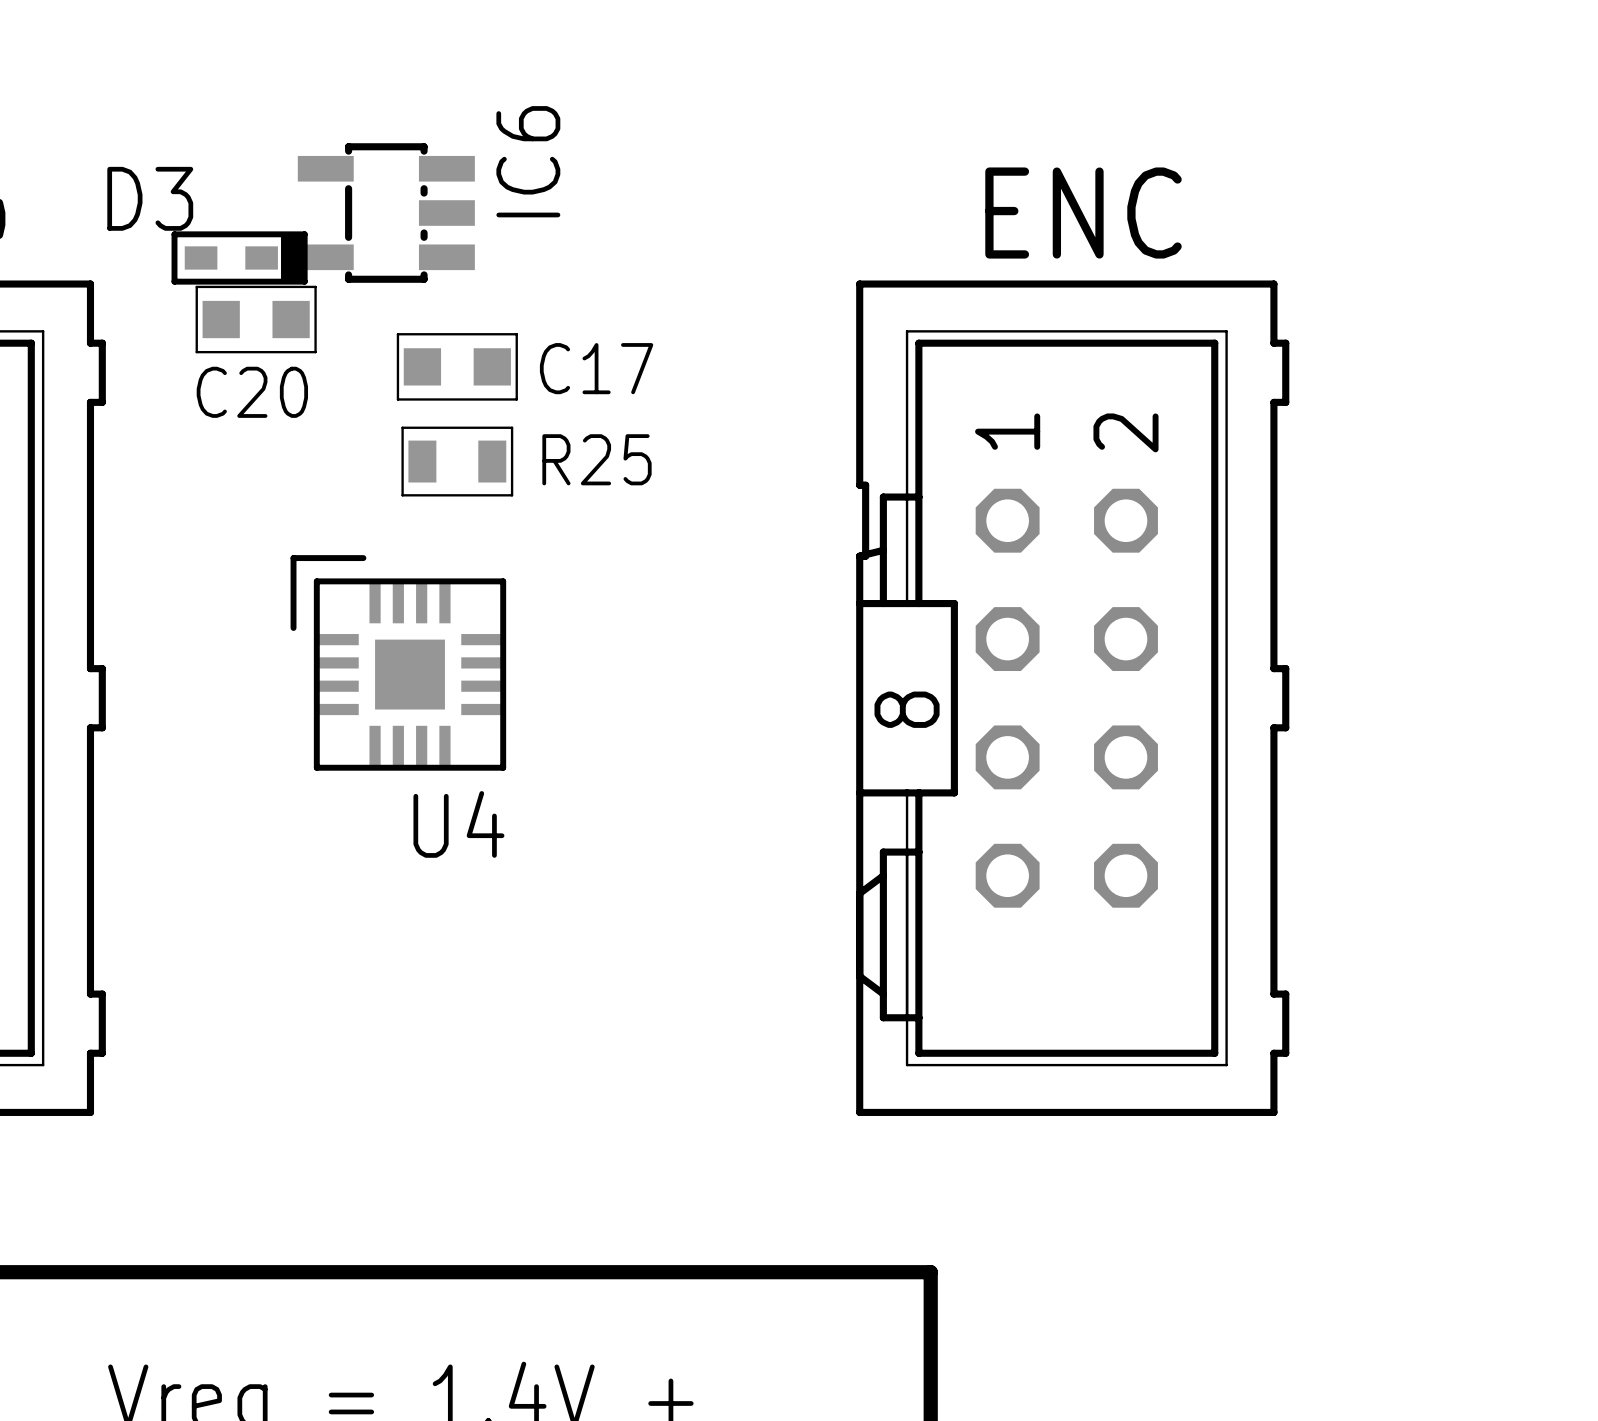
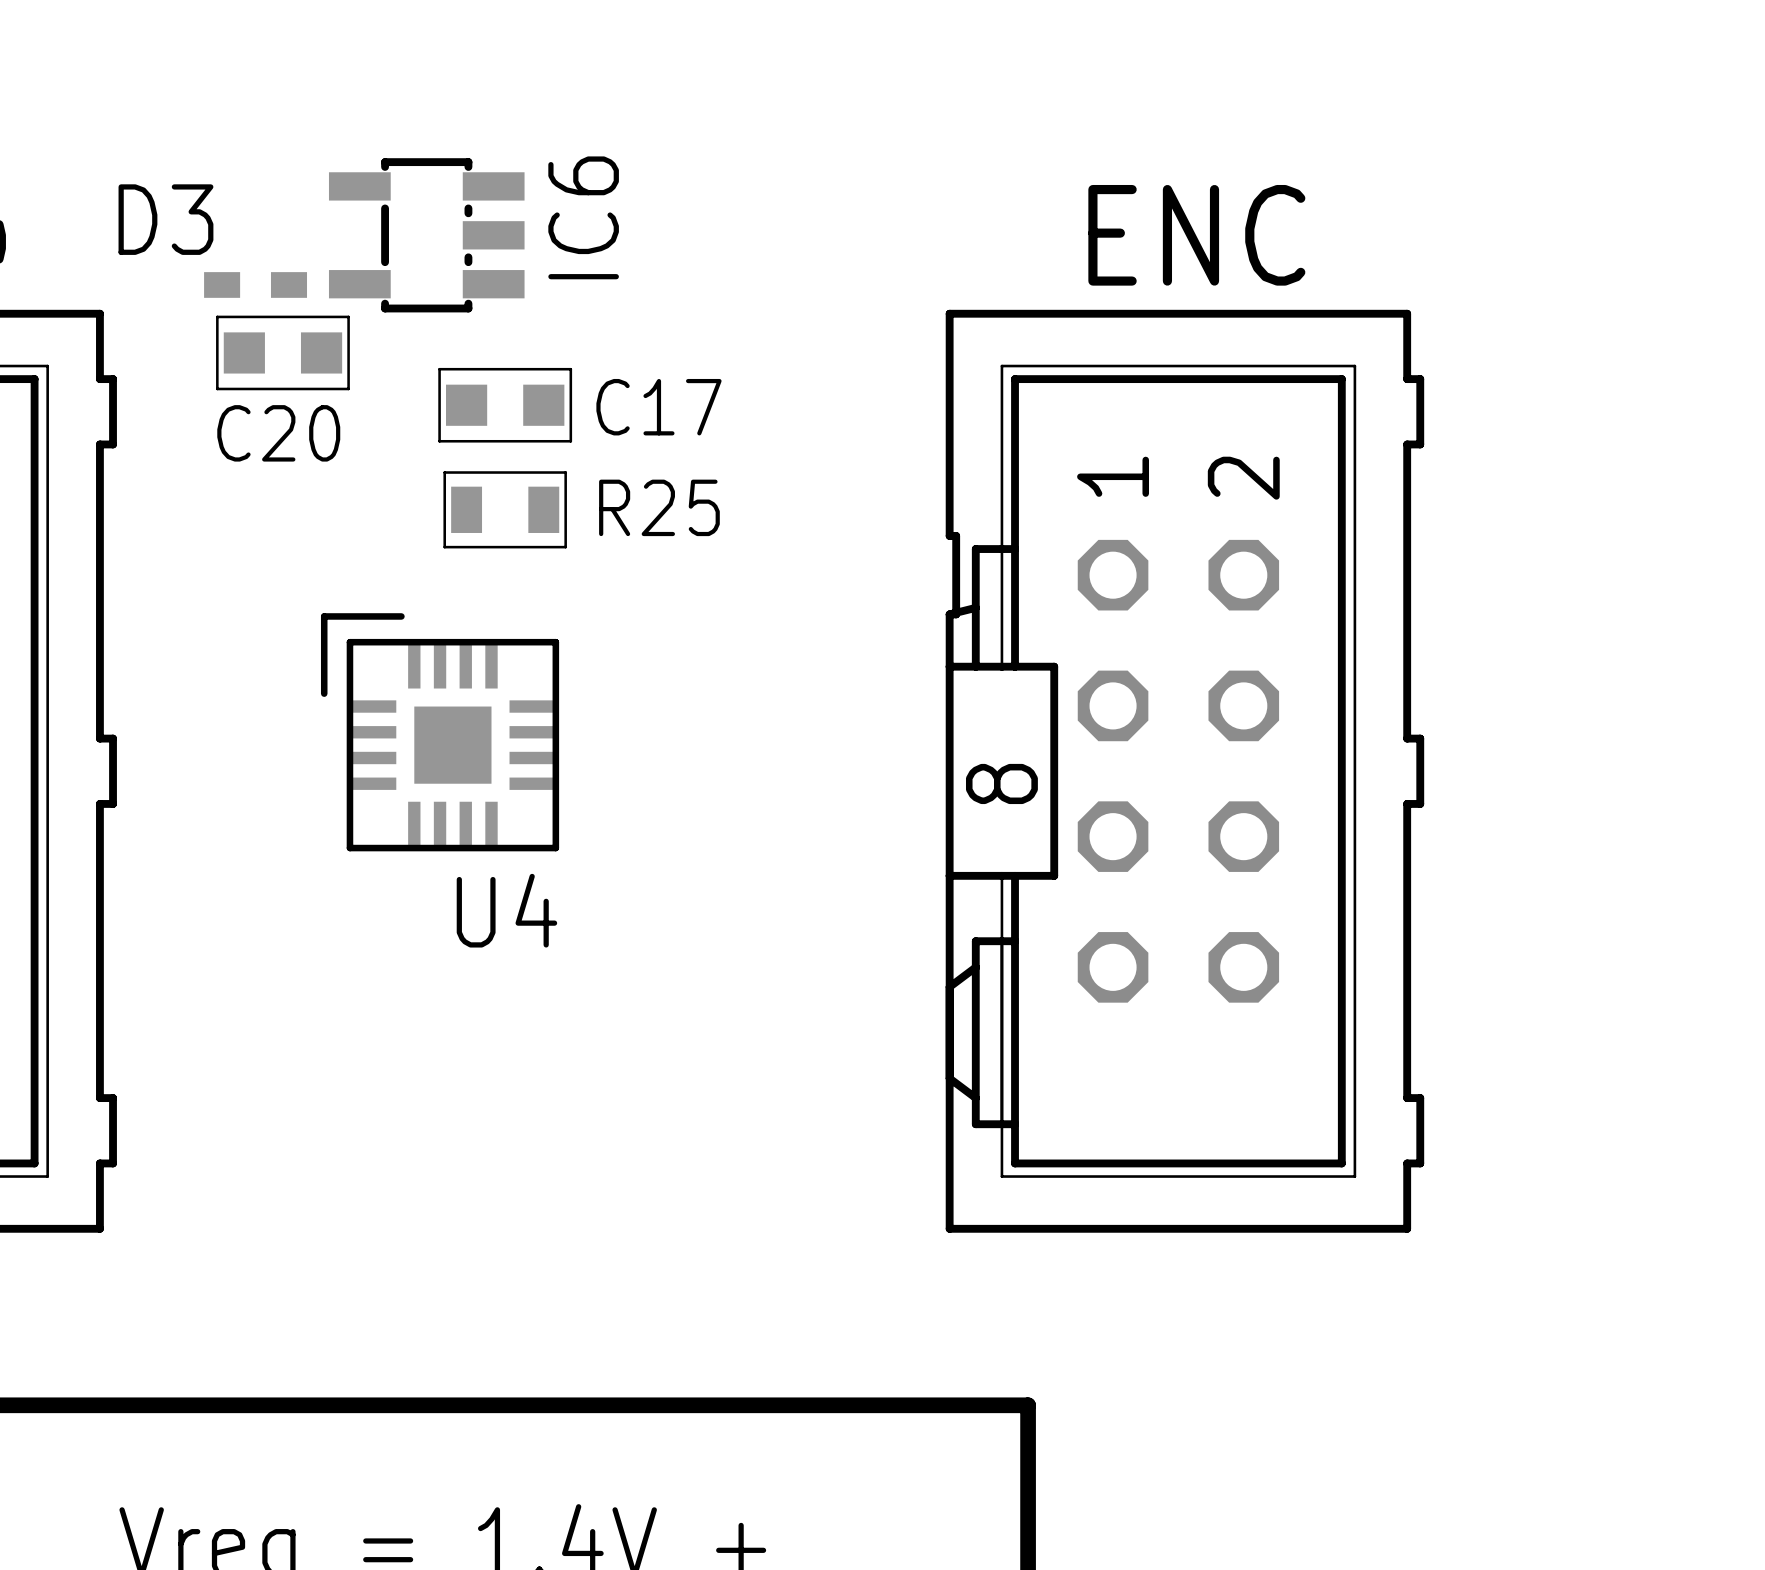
IC6 name position: IC6 (528, 161) -> IC6 (583, 217)
D3 footprint: [171, 231, 308, 285] -> [204, 272, 308, 298]

